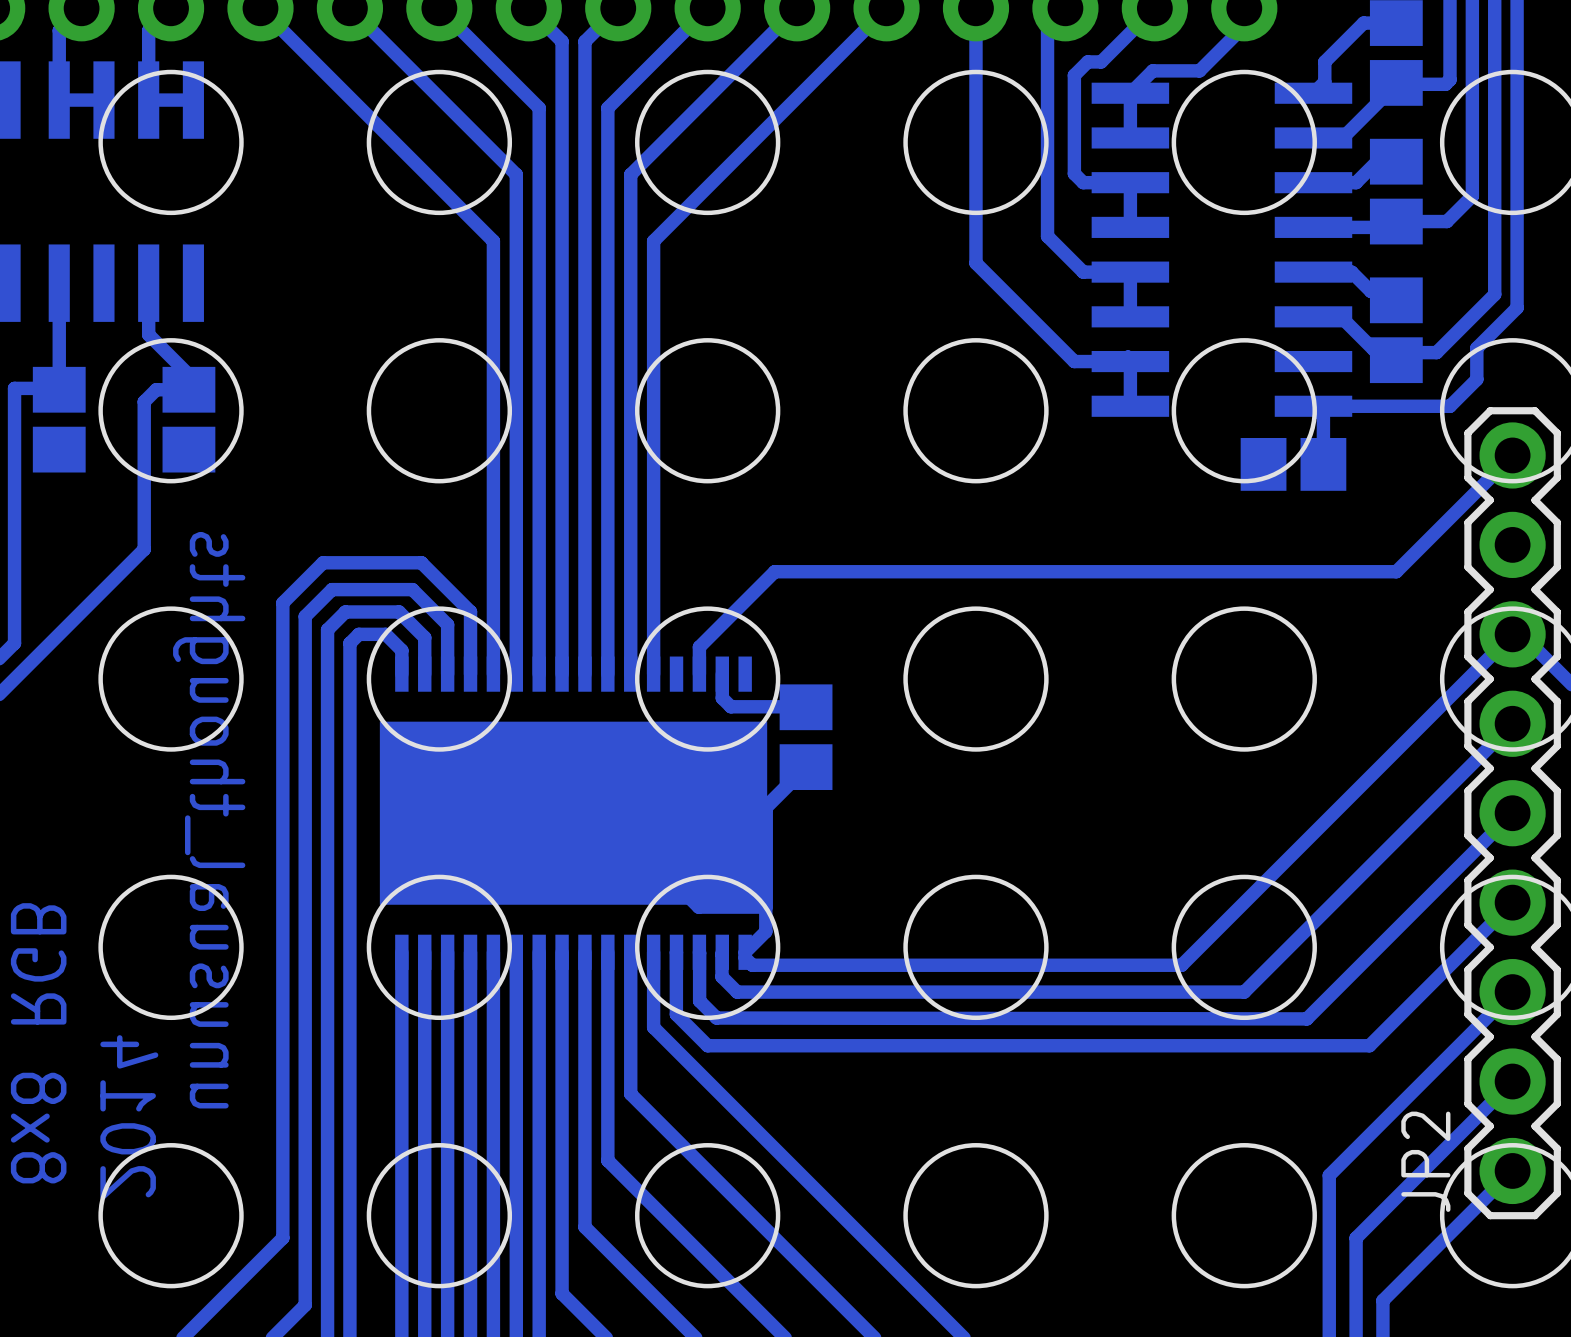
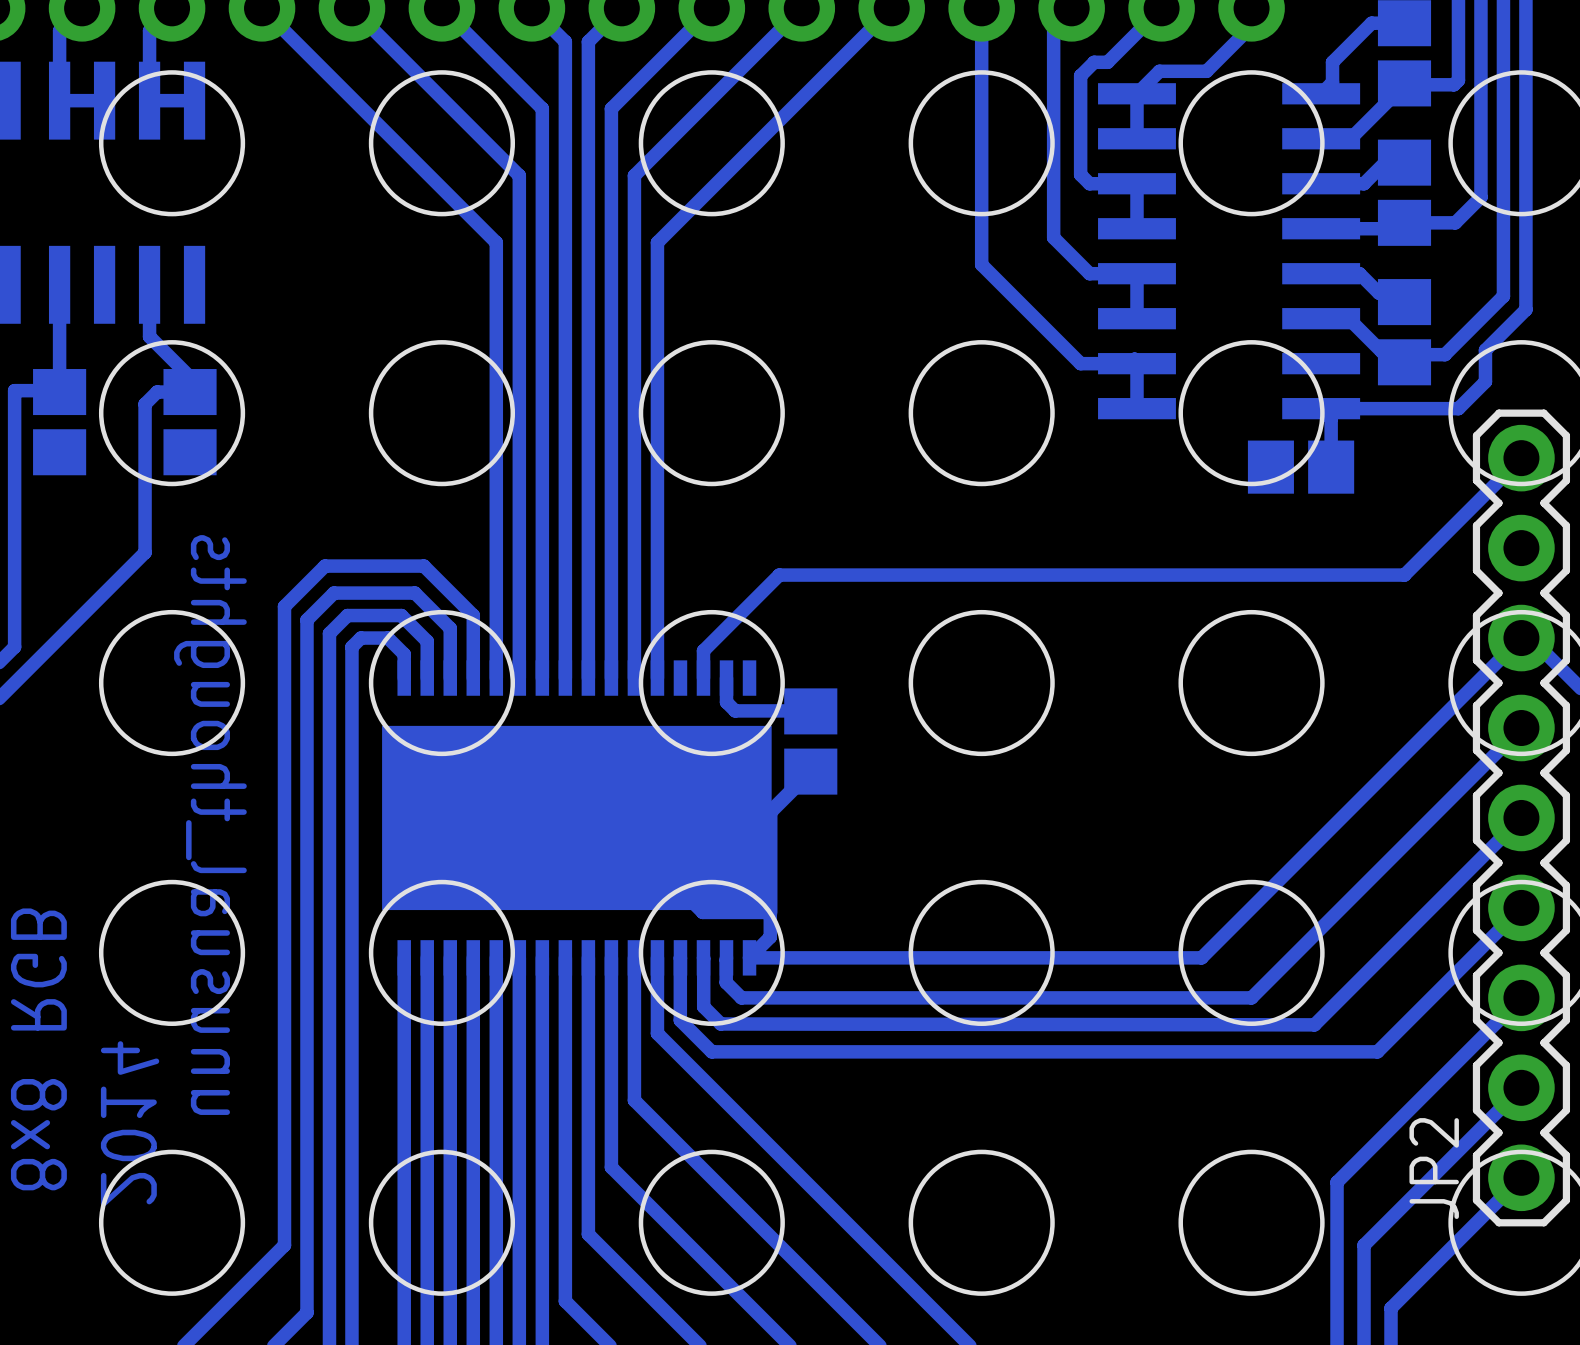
bottom track: (745, 952) (745, 958) (752, 965) (1181, 965) (1194, 952) -> (749, 957) (1201, 957)

